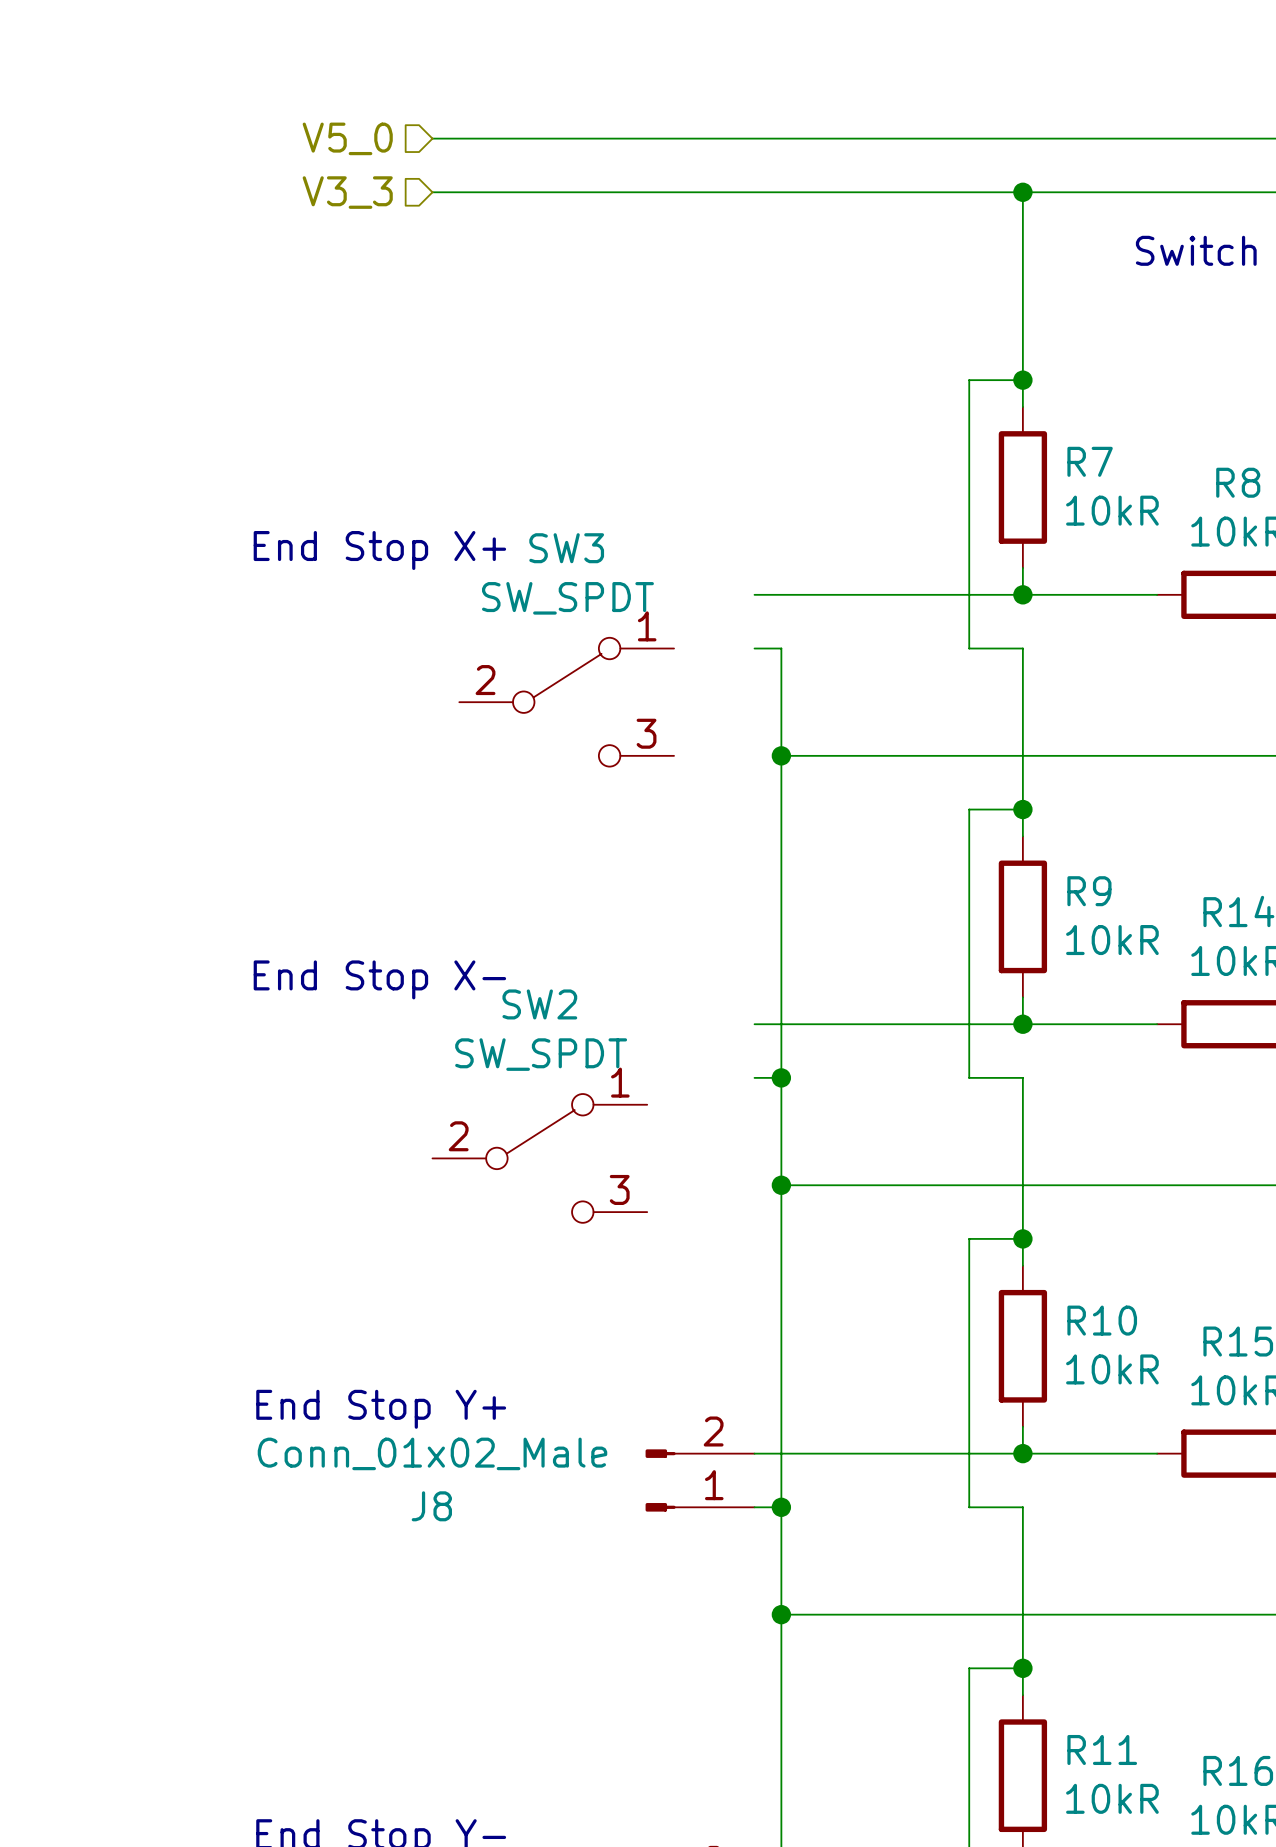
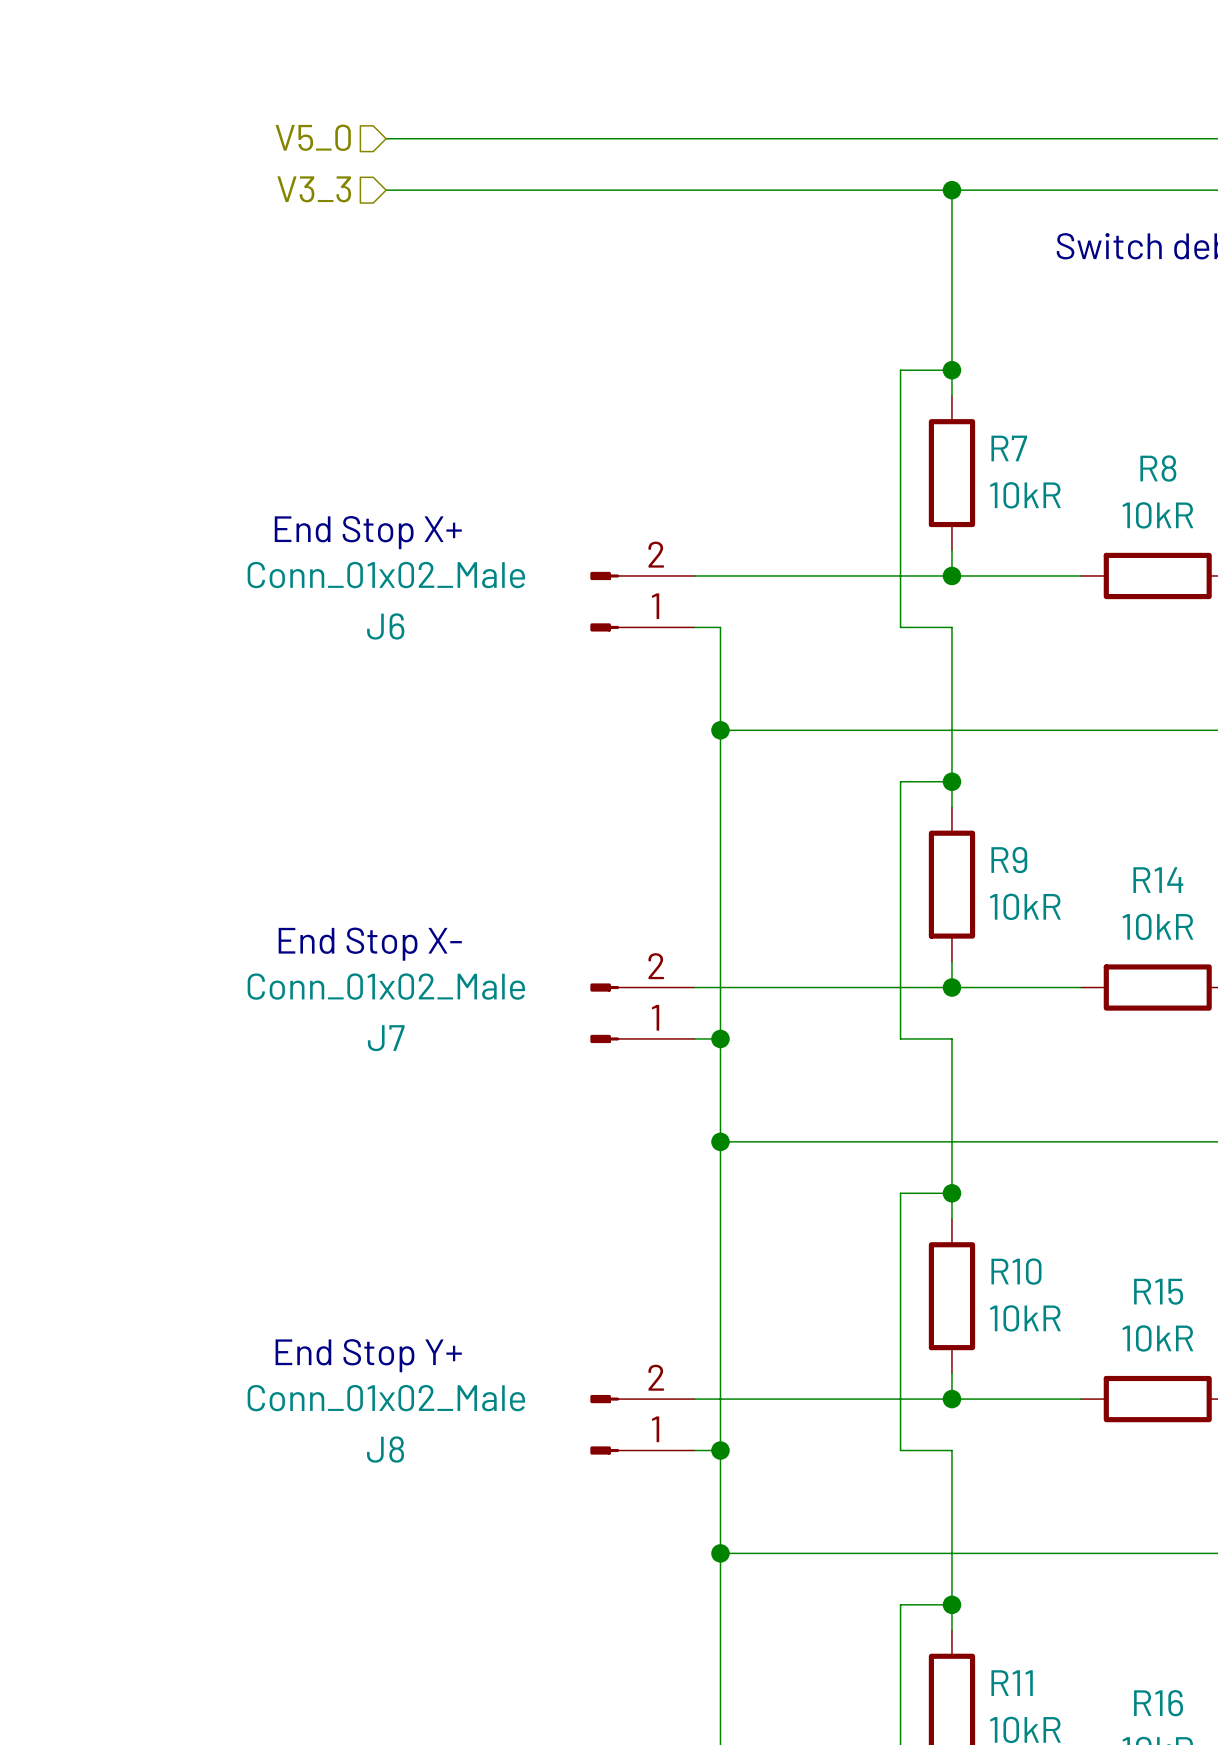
J6: none -> Conn_01x02_Male (642, 601)
SW3: SW_SPDT (566, 702) -> none
J7: none -> Conn_01x02_Male (642, 1013)
SW2: SW_SPDT (539, 1158) -> none

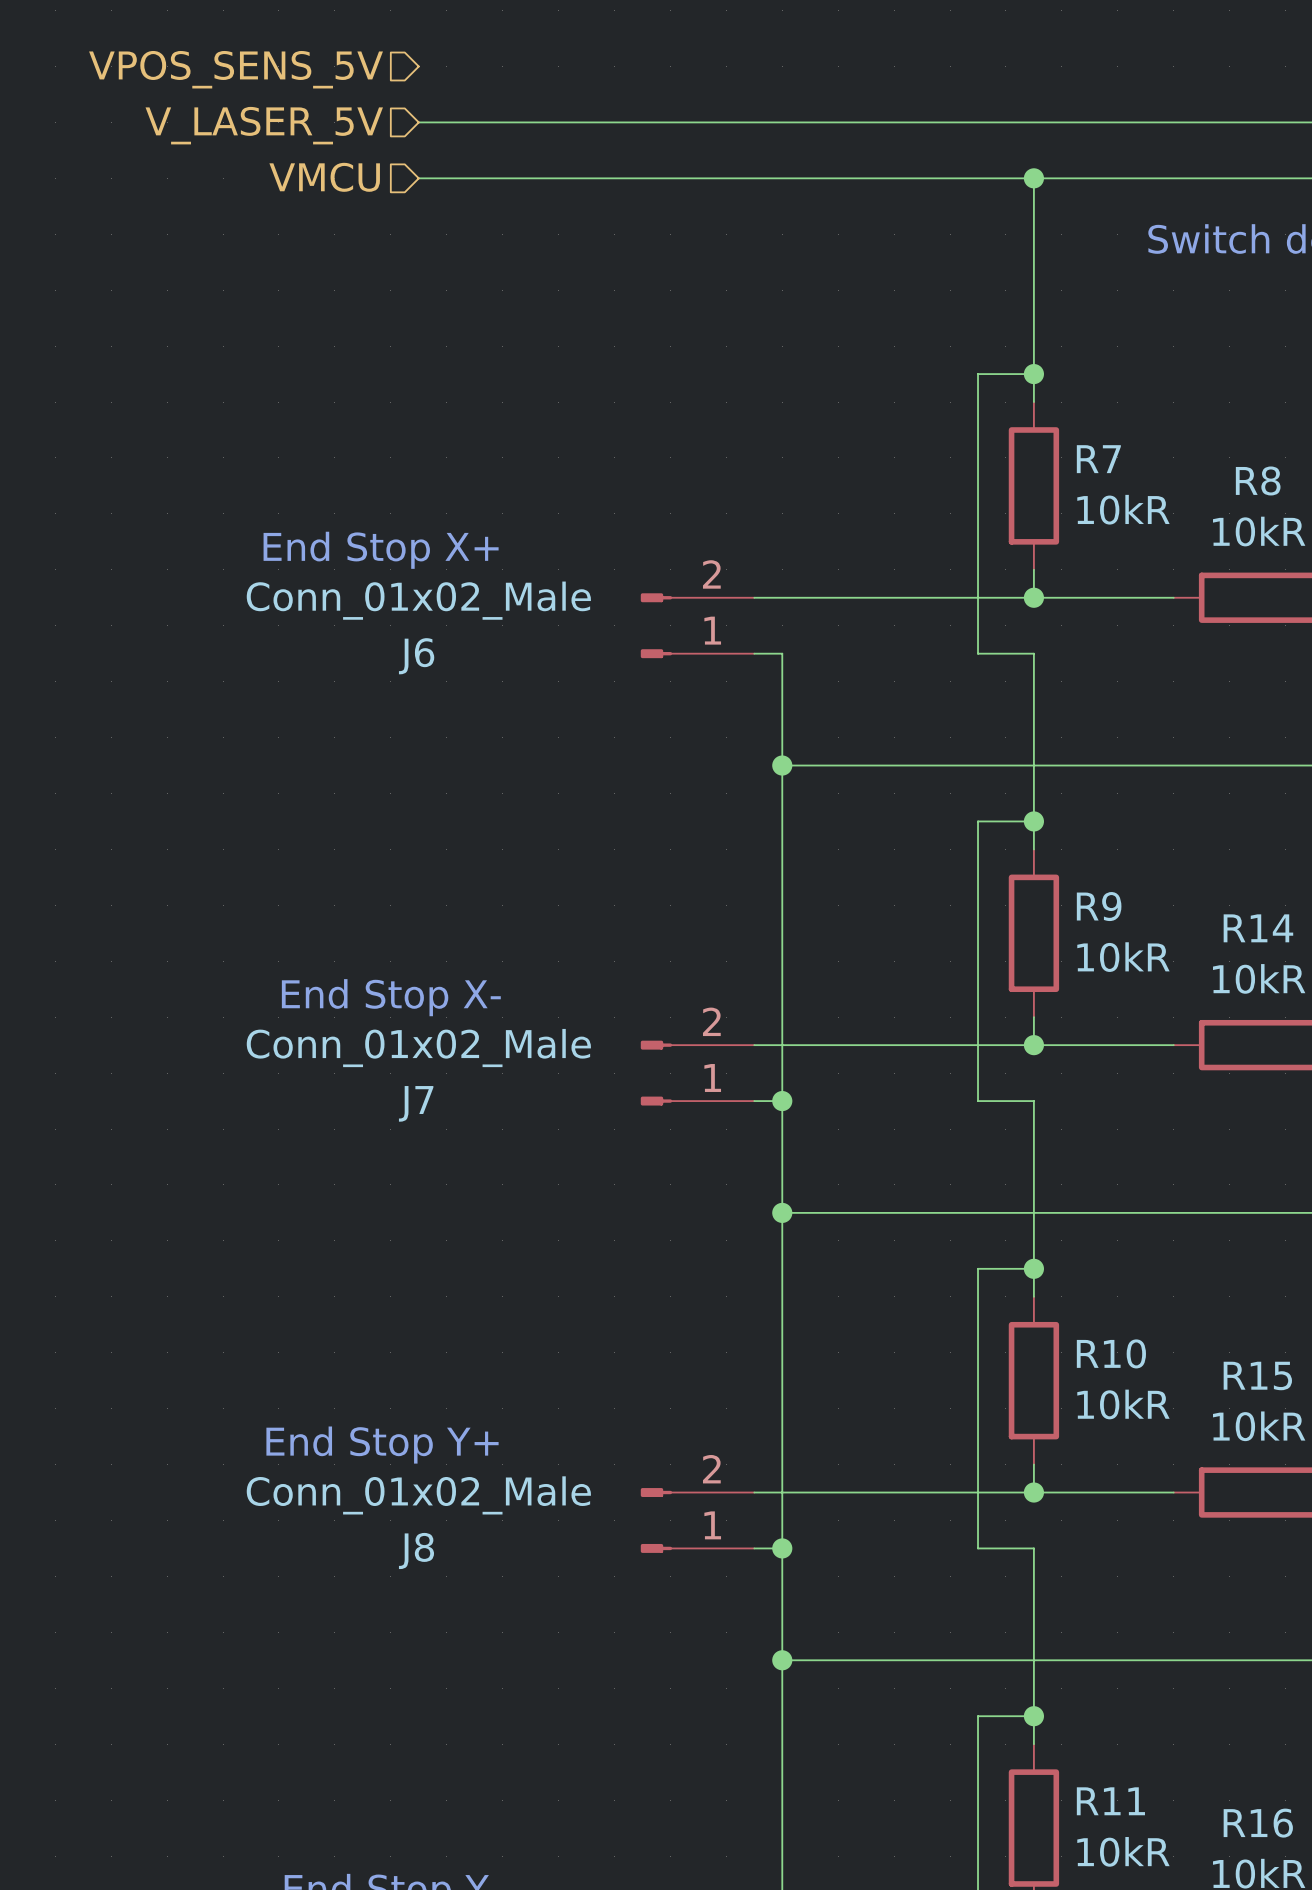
hierarchical label: none -> VPOS_SENS_5V (236, 69)
hierarchical label: V5_0 (313, 137) -> V_LASER_5V (264, 125)
hierarchical label: V3_3 (314, 189) -> VMCU (324, 177)

